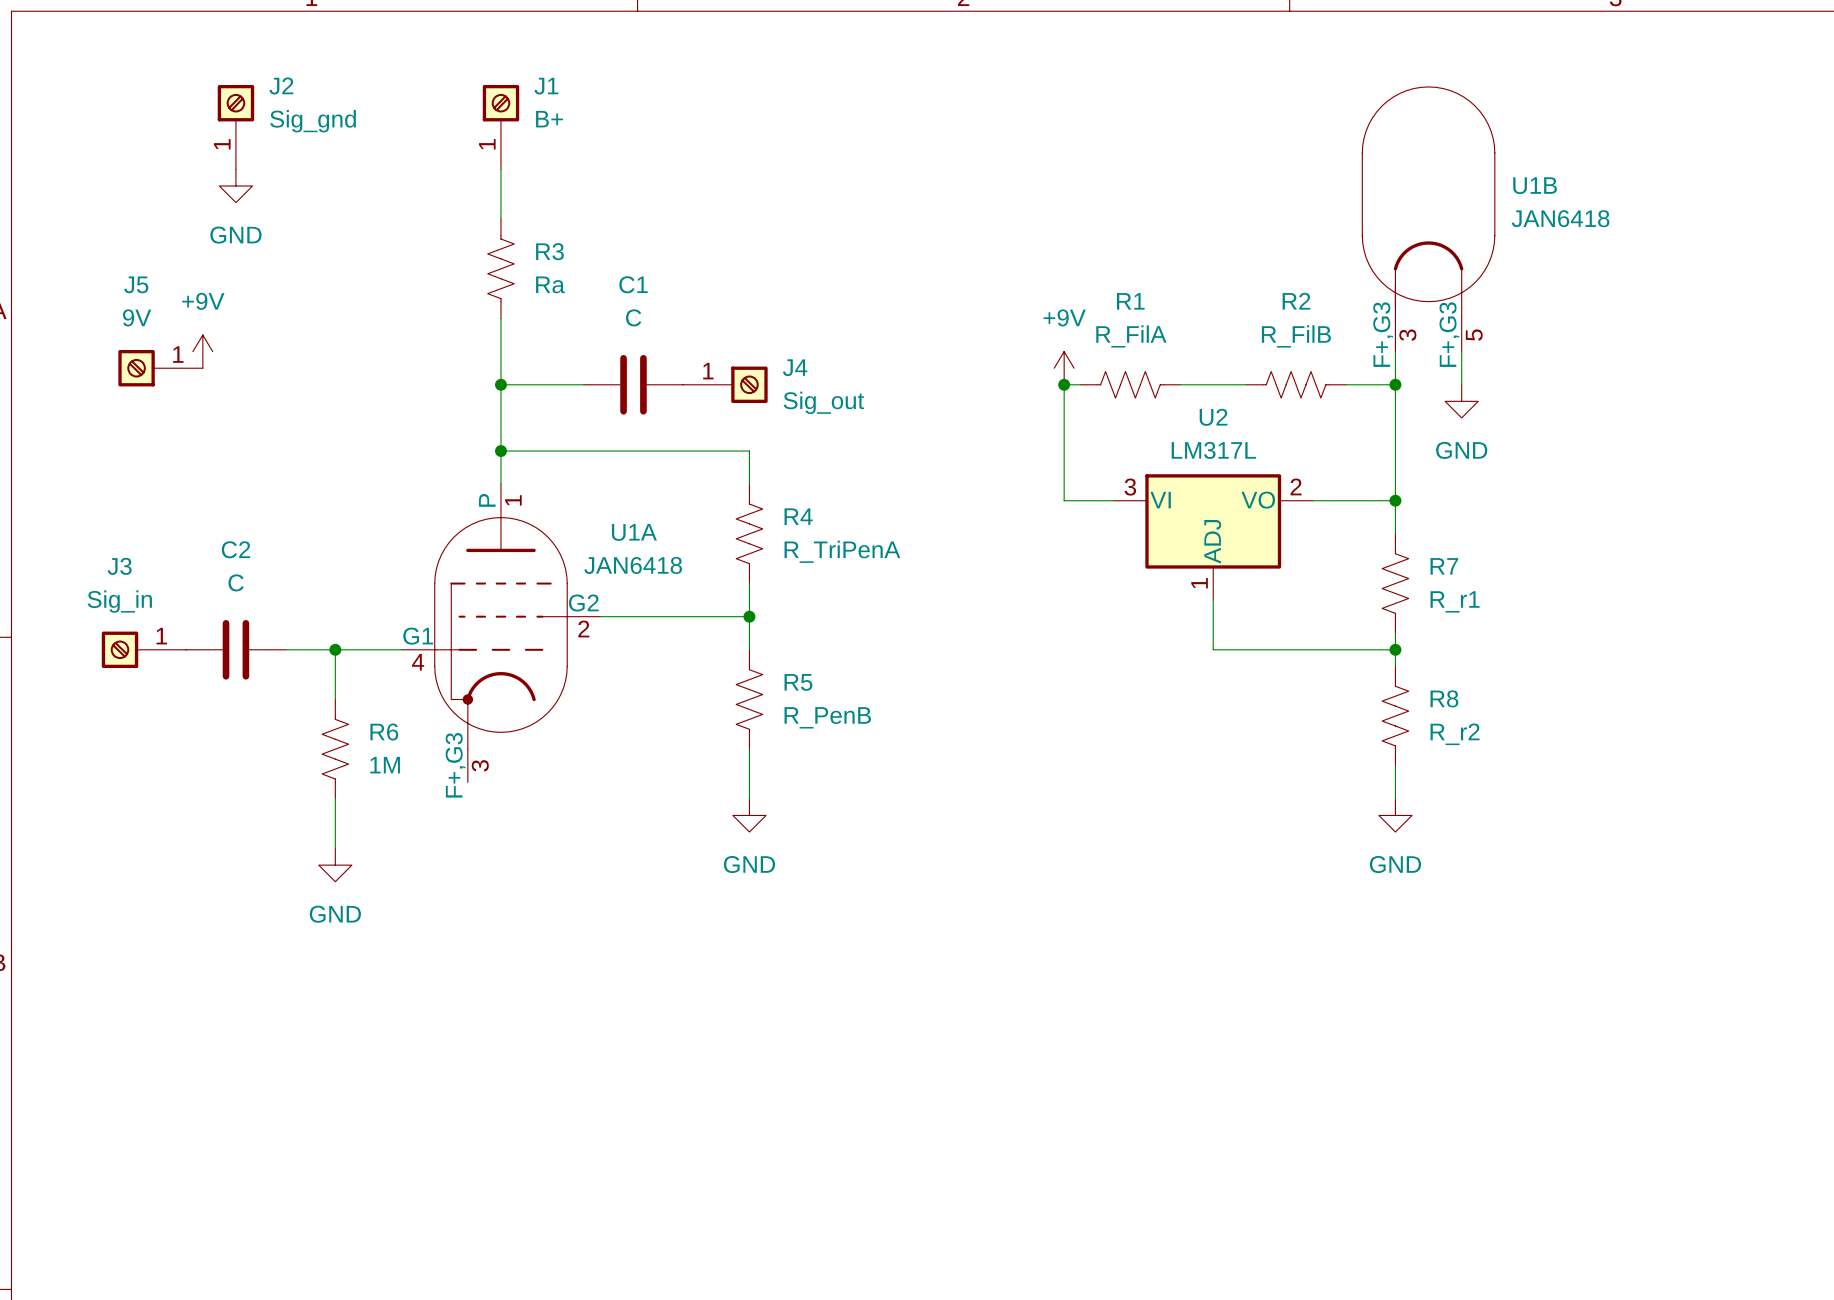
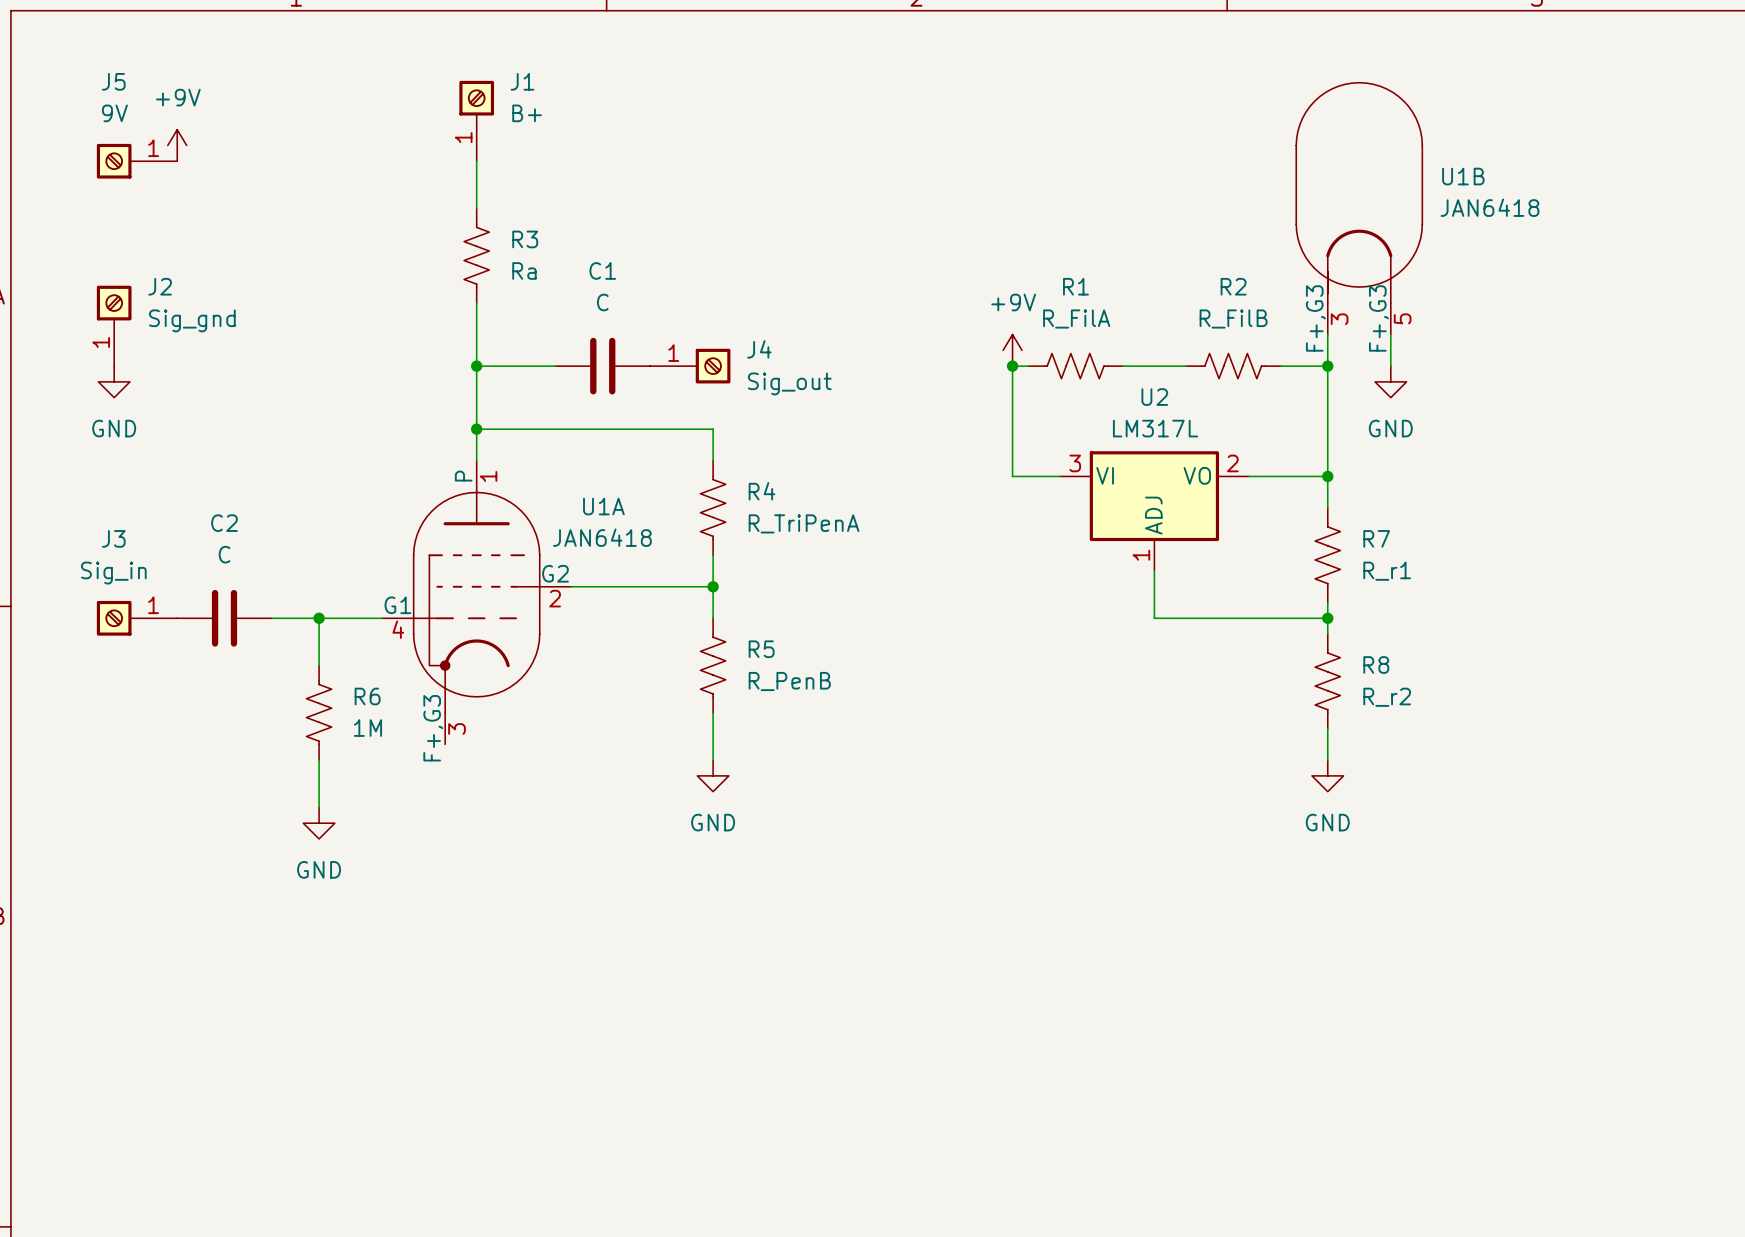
J2 position: (235, 127) -> (114, 325)
power symbol position: GND (235, 186) -> GND (114, 381)
power symbol position: +9V (202, 351) -> +9V (177, 145)
J5 position: (160, 368) -> (137, 161)

